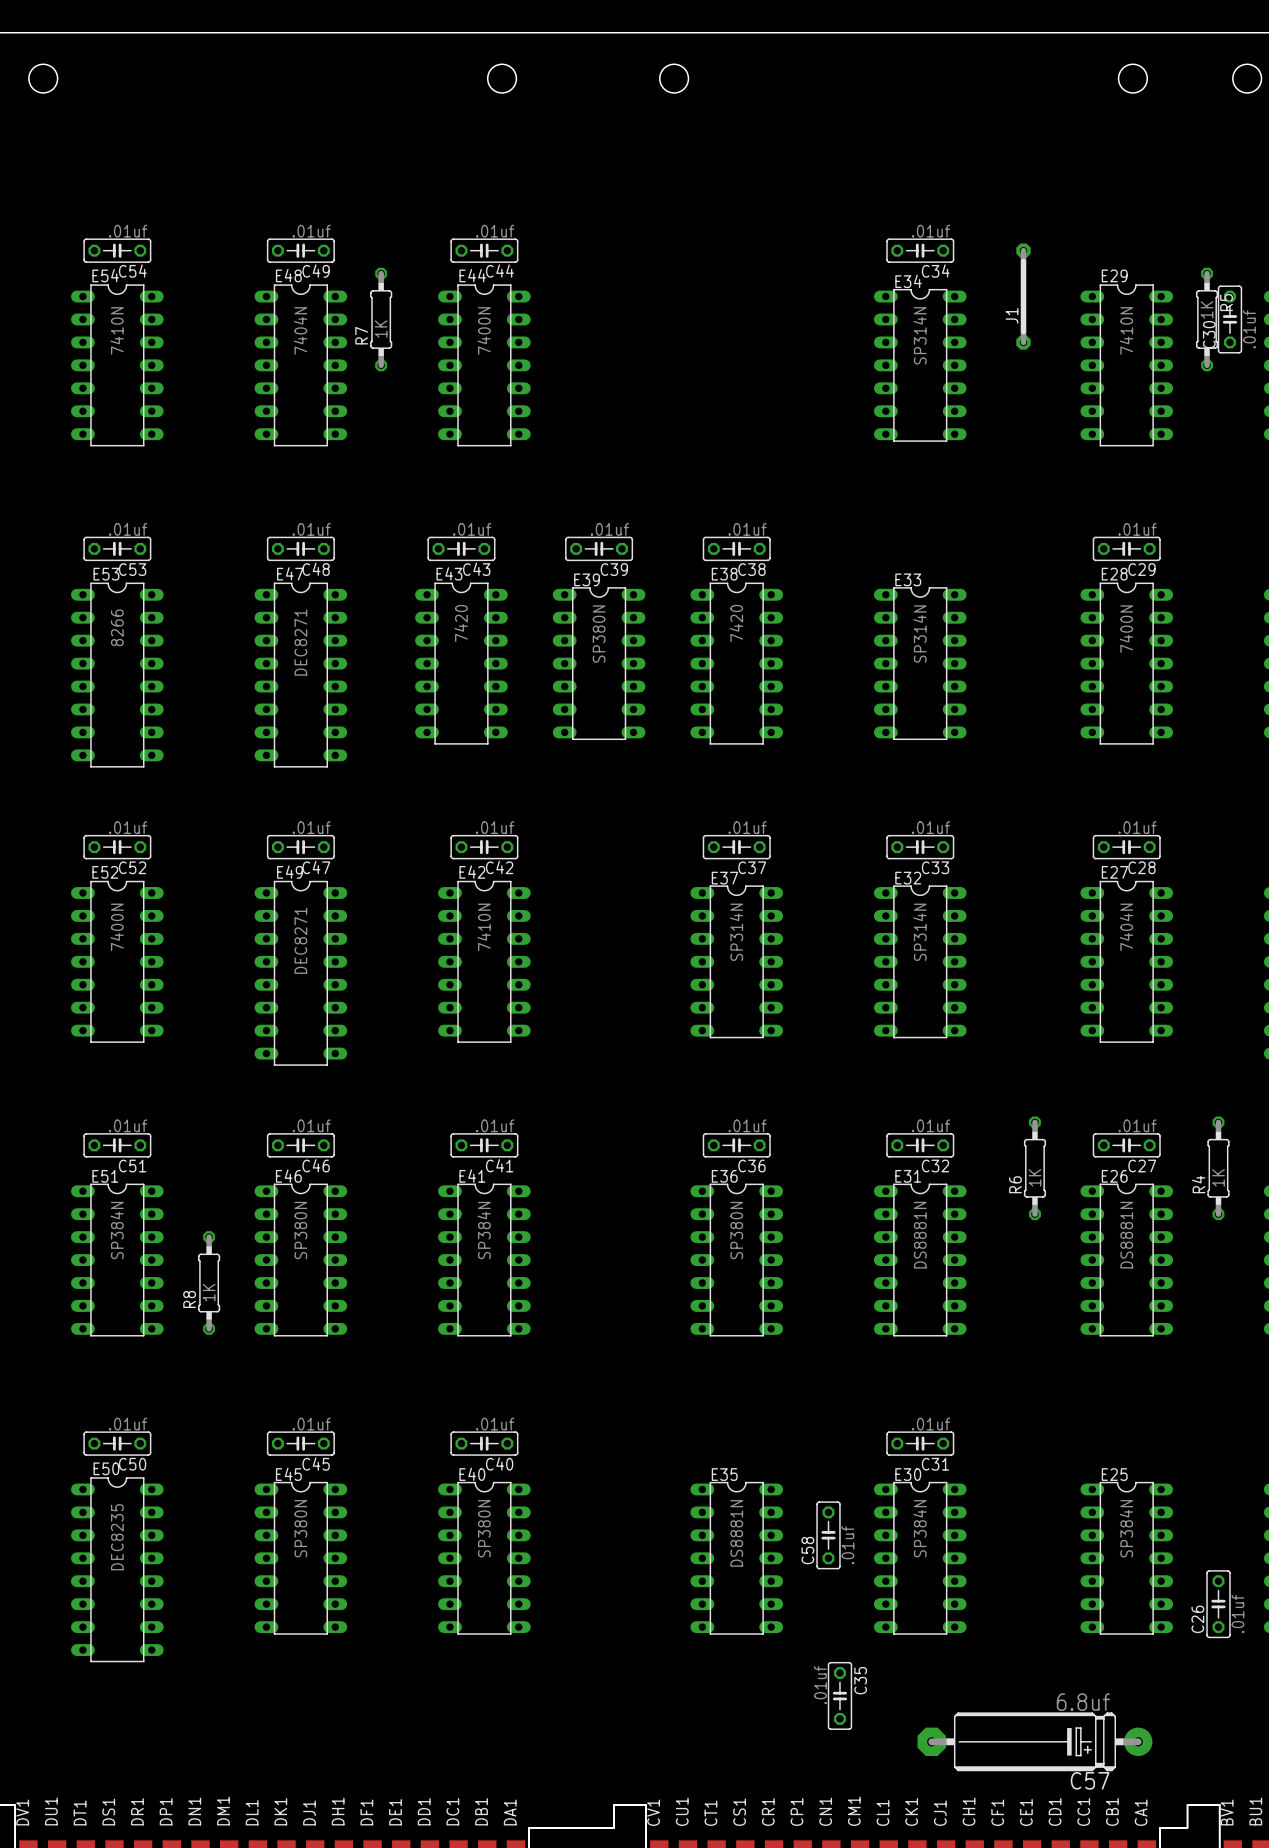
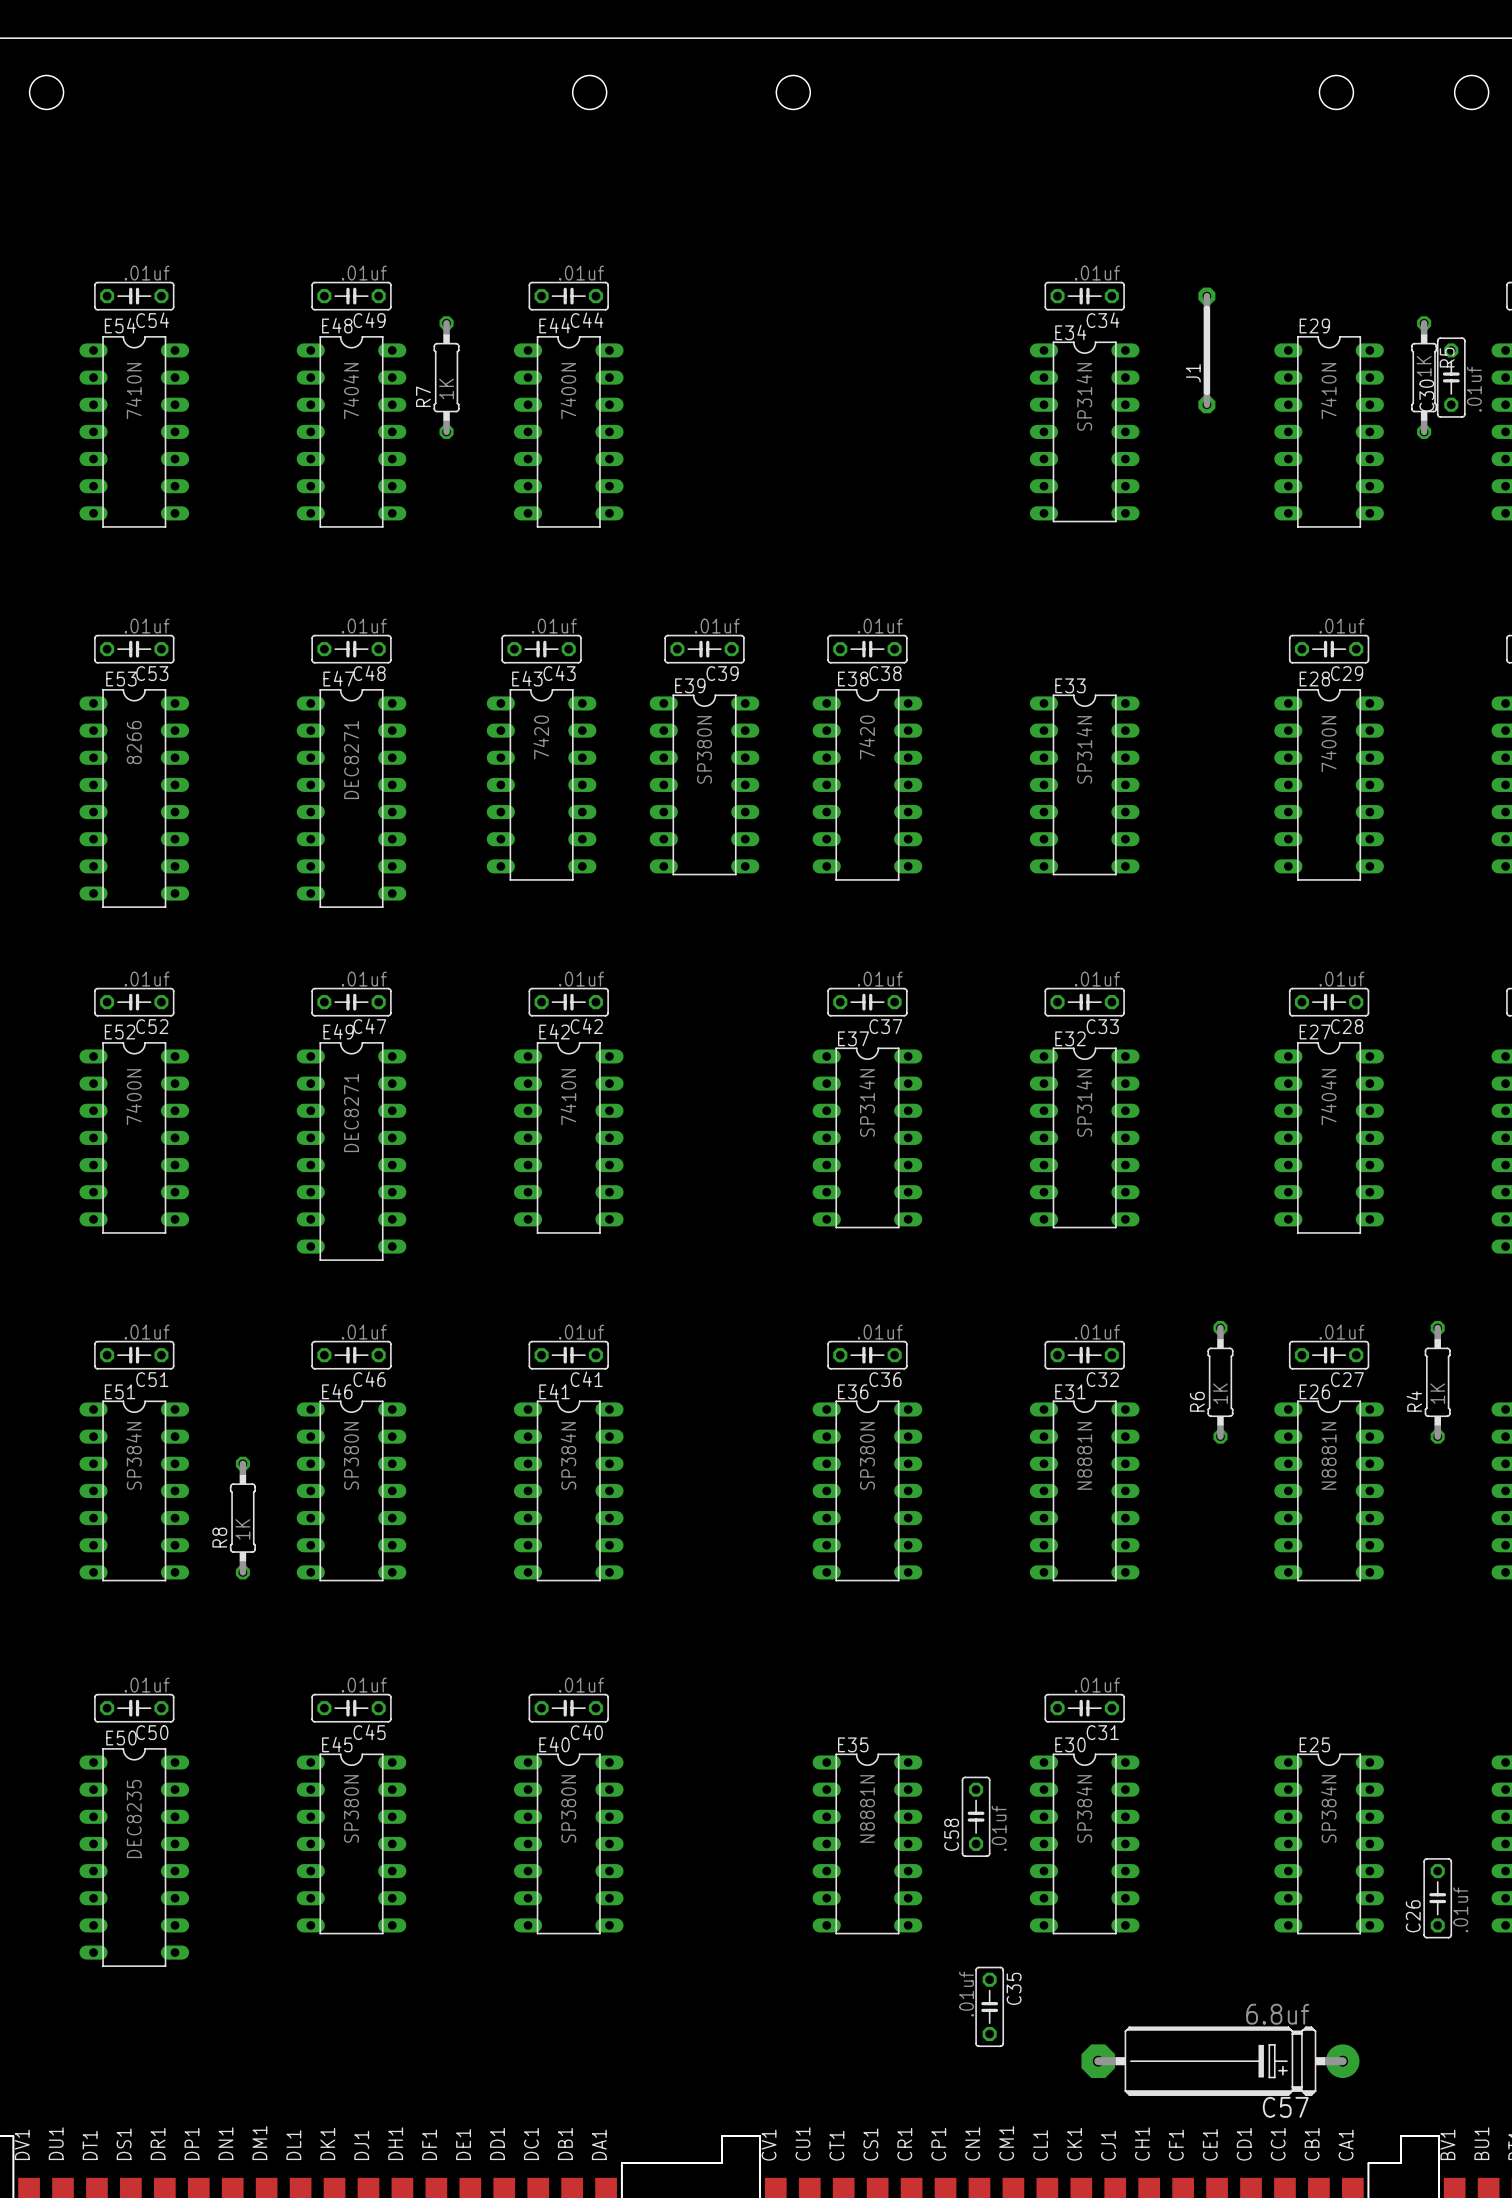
E31 value: DS8881N (920, 1235) -> N8881N (1084, 1455)
E26 value: DS8881N (1126, 1235) -> N8881N (1329, 1455)
E35 value: DS8881N (736, 1533) -> N8881N (867, 1808)

